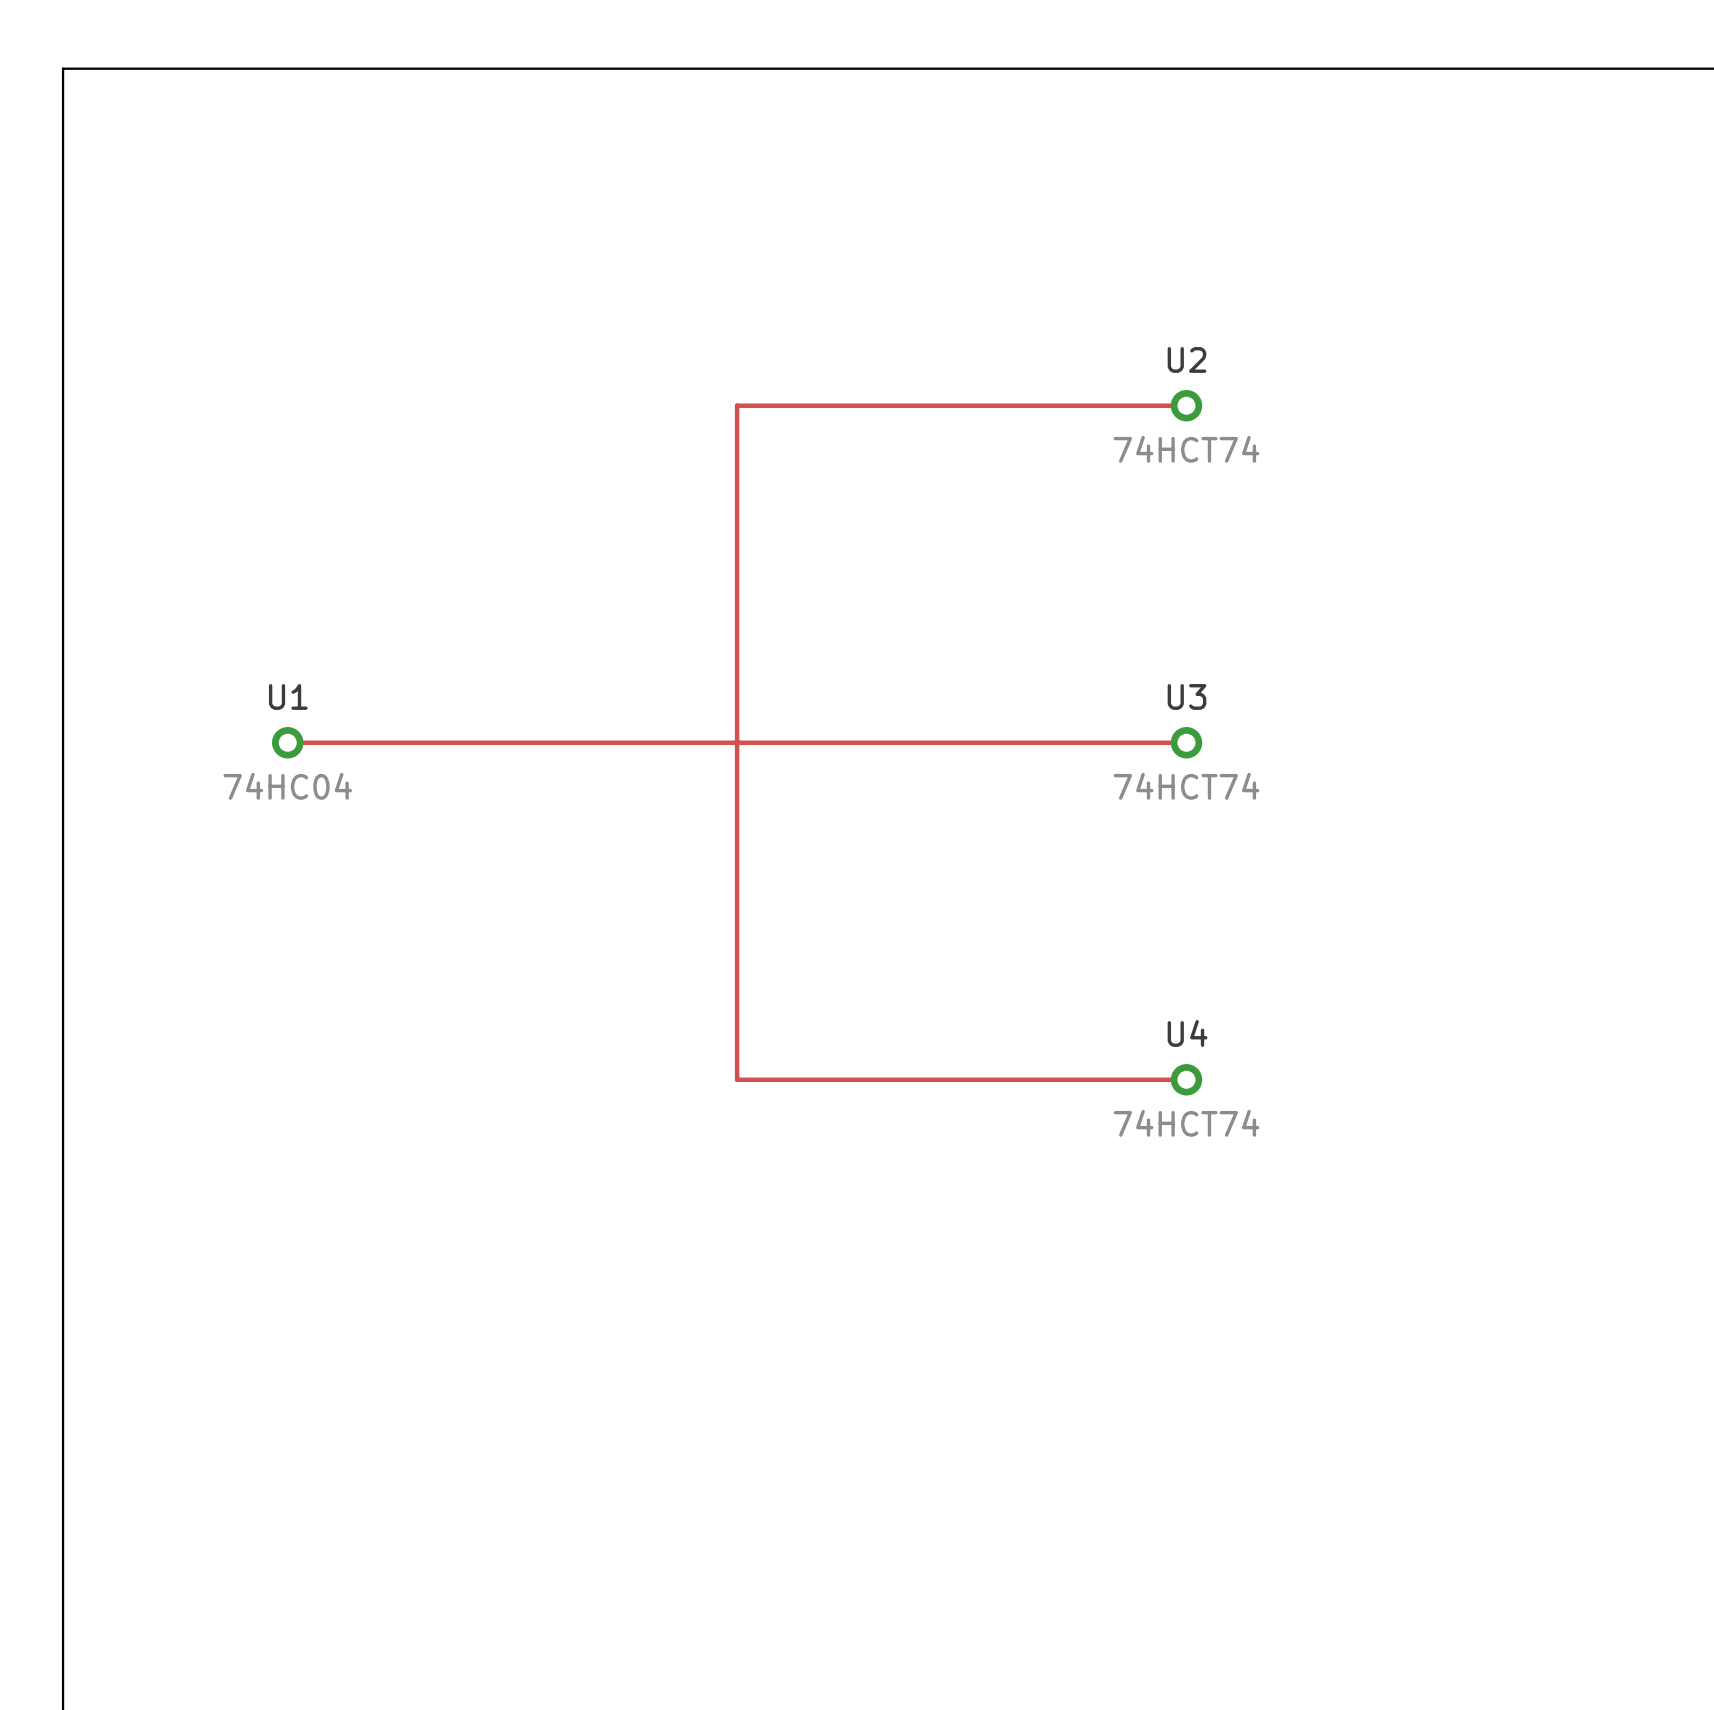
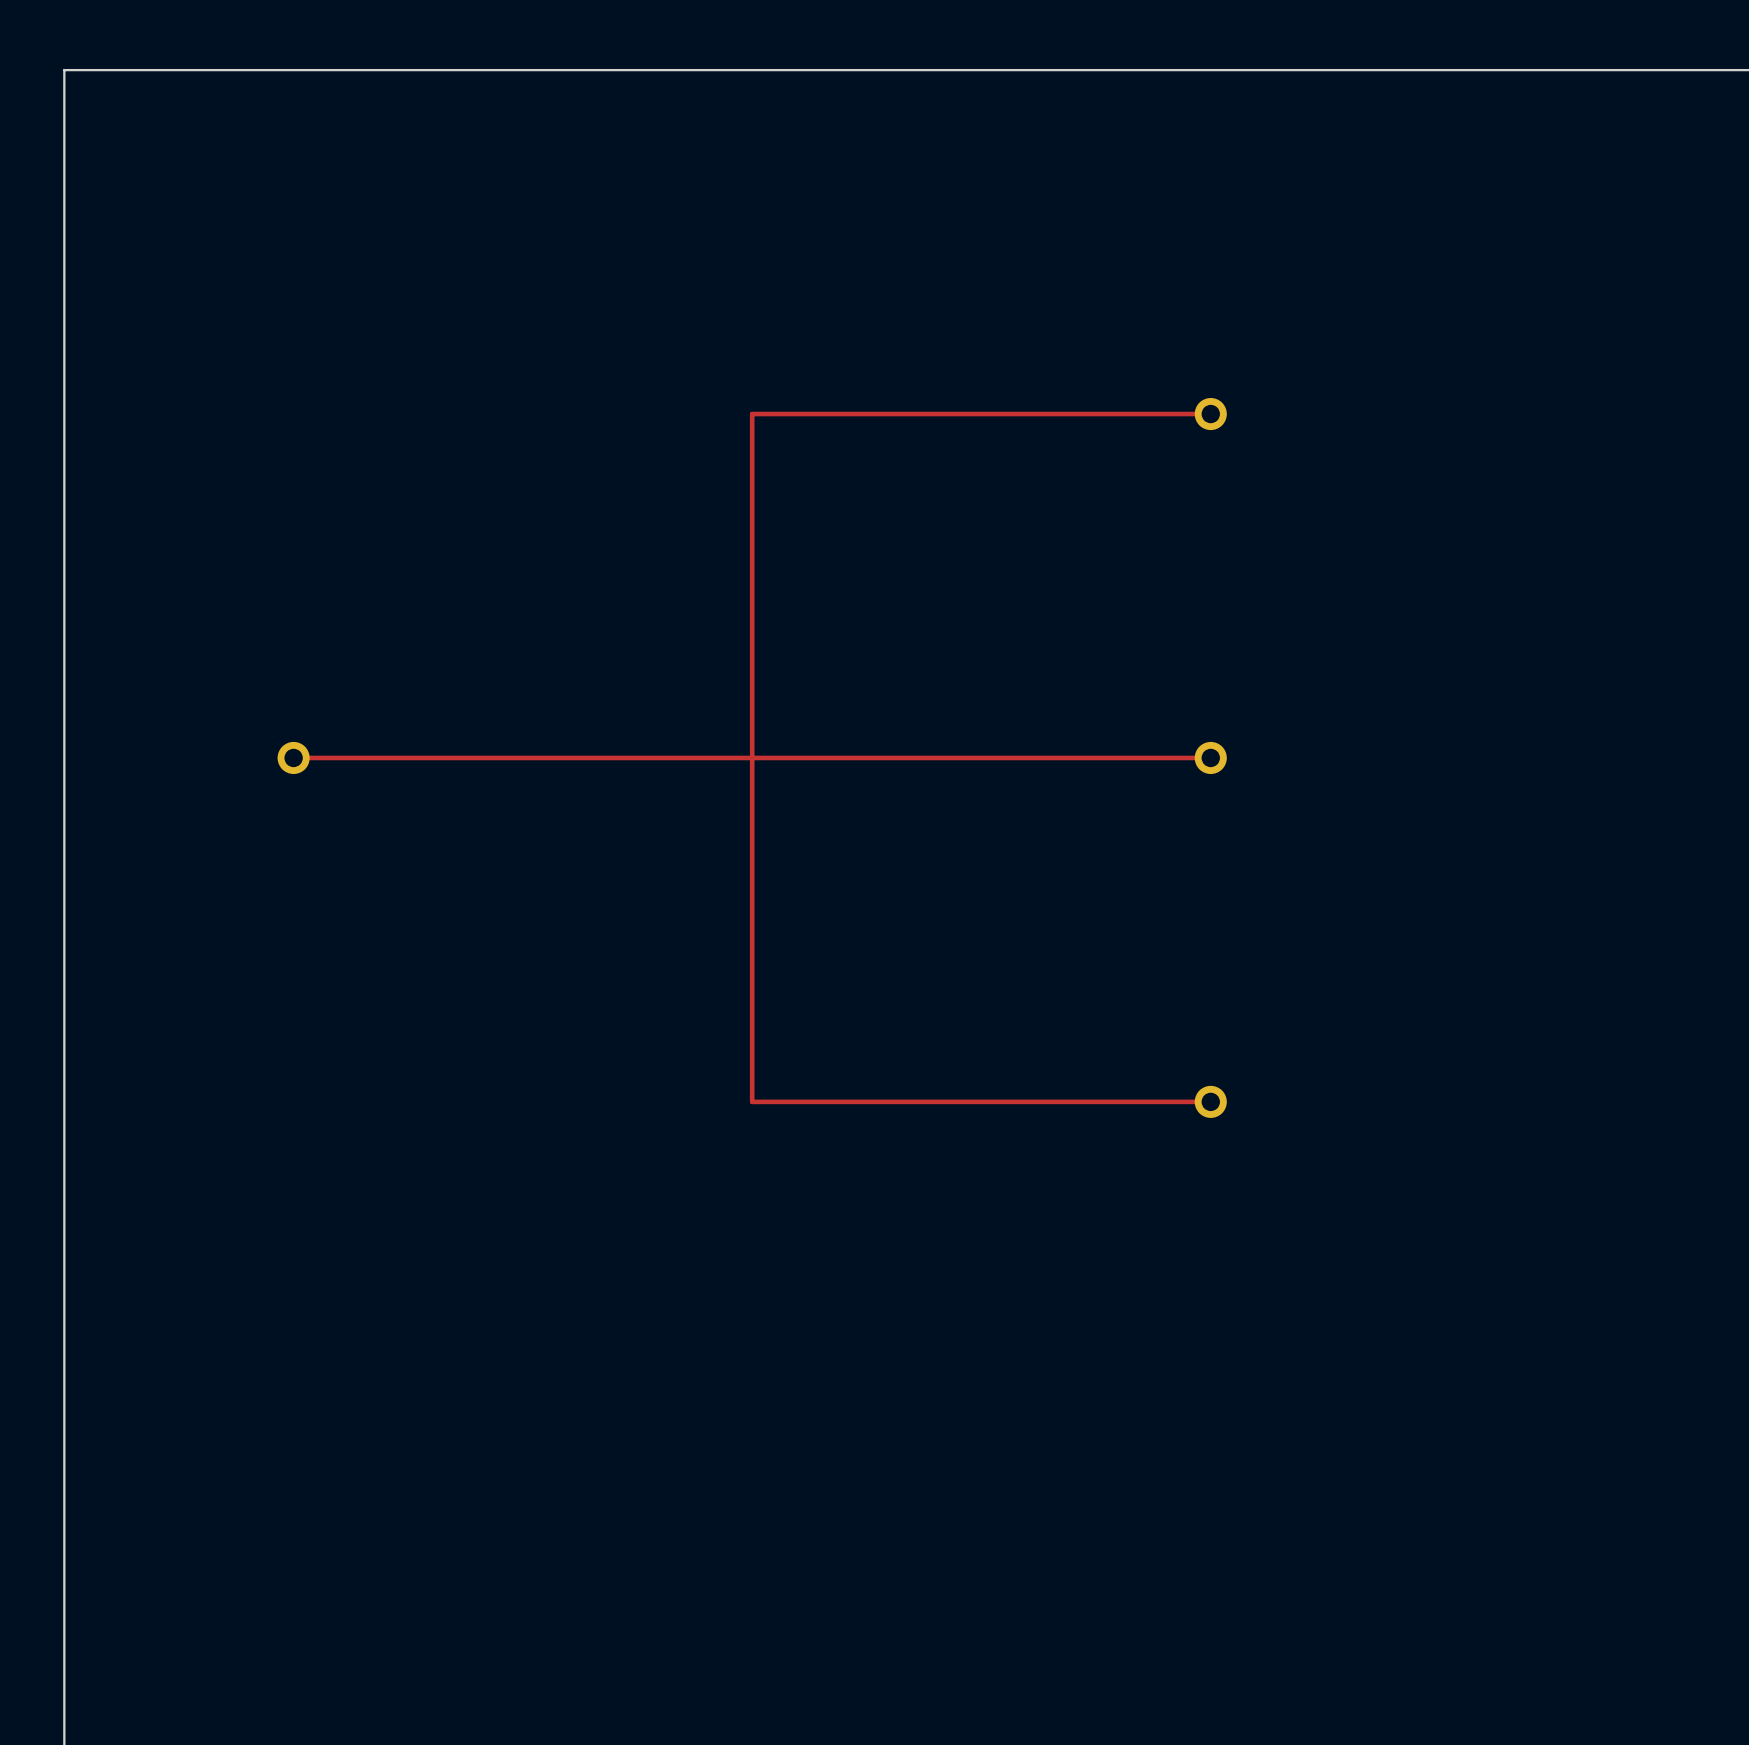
U2 name: U2 (1187, 359) -> none
U2 value: 74HCT74 (1186, 449) -> none
U1 name: U1 (288, 696) -> none
U3 name: U3 (1187, 696) -> none
U1 value: 74HC04 (287, 786) -> none
U3 value: 74HCT74 (1186, 786) -> none
U4 name: U4 (1187, 1033) -> none
U4 value: 74HCT74 (1186, 1123) -> none

